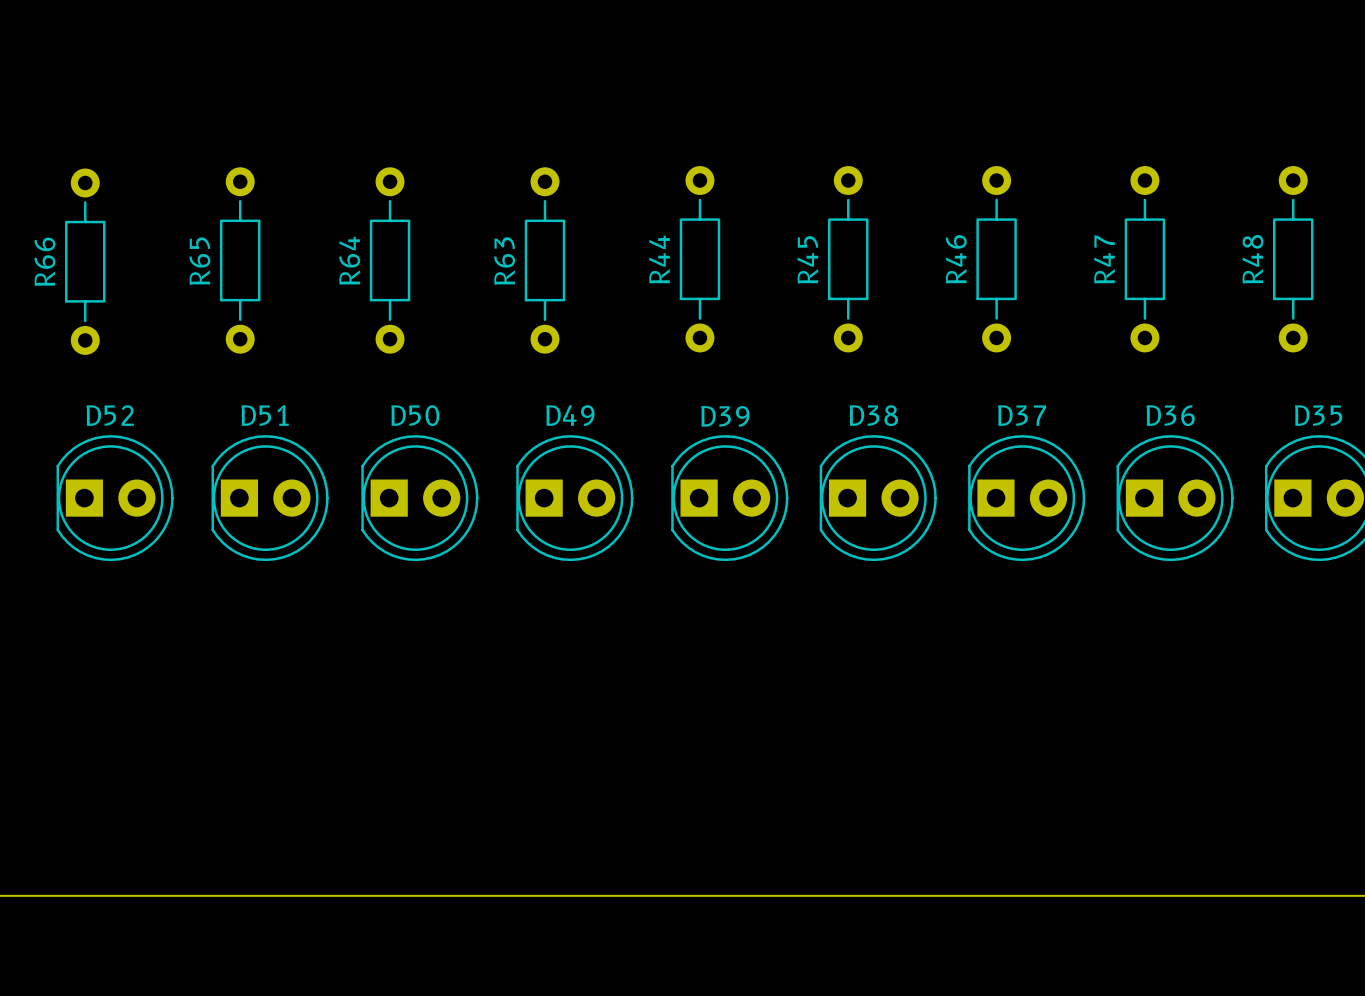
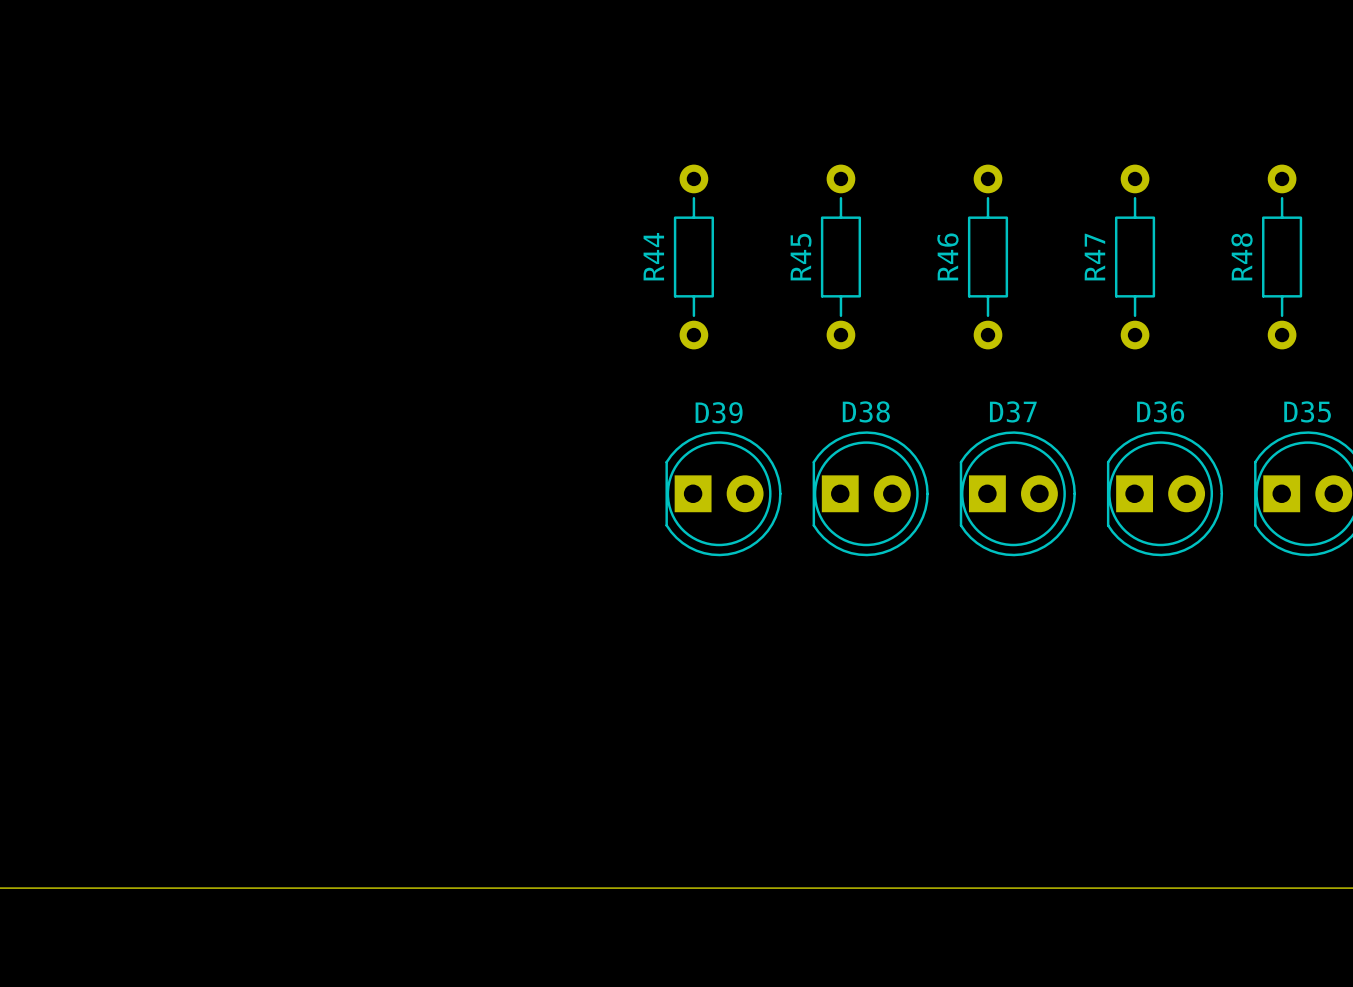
R65: (240, 260) -> none
R64: (390, 260) -> none
R63: (544, 260) -> none
R66: (85, 261) -> none
D52: (115, 498) -> none
D51: (270, 498) -> none
D50: (419, 498) -> none
D49: (574, 498) -> none

